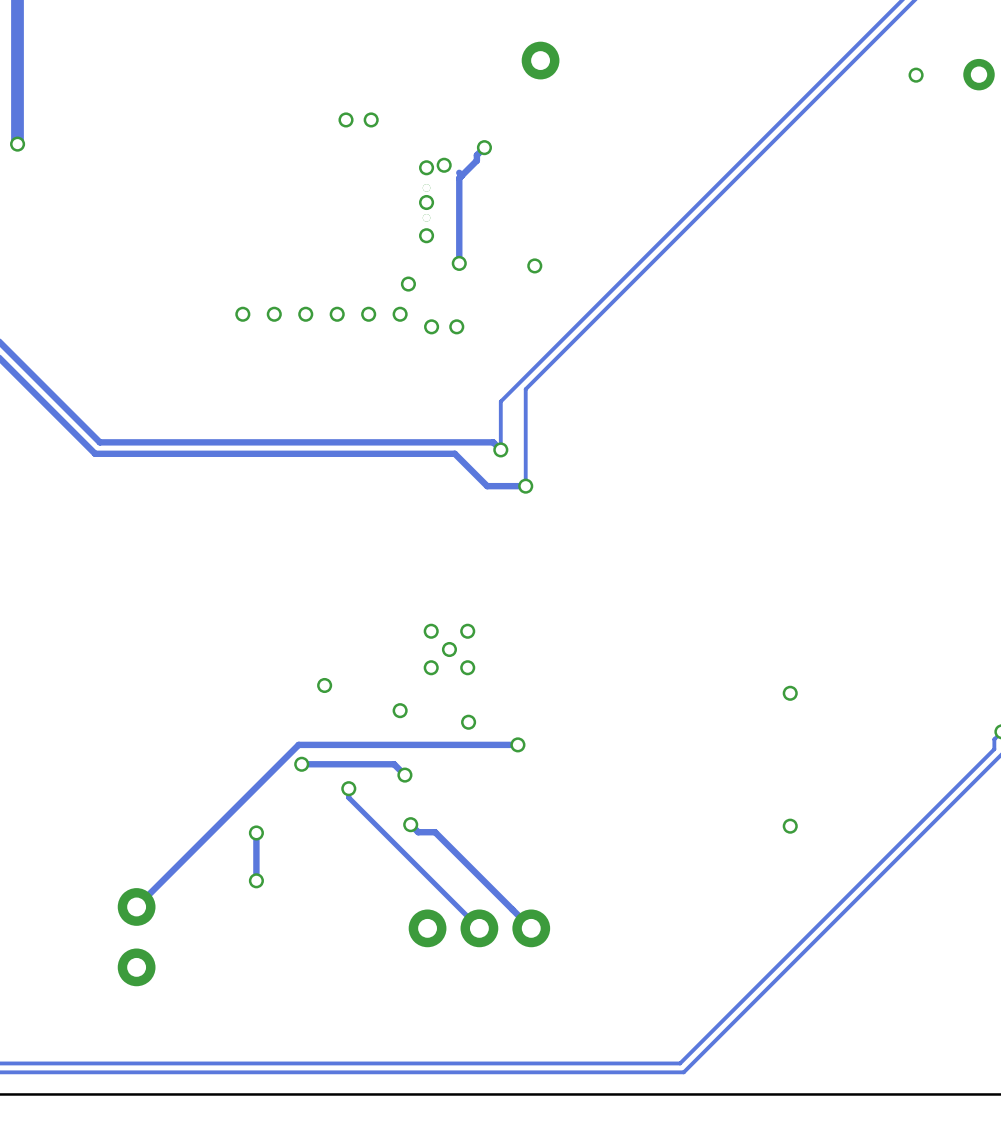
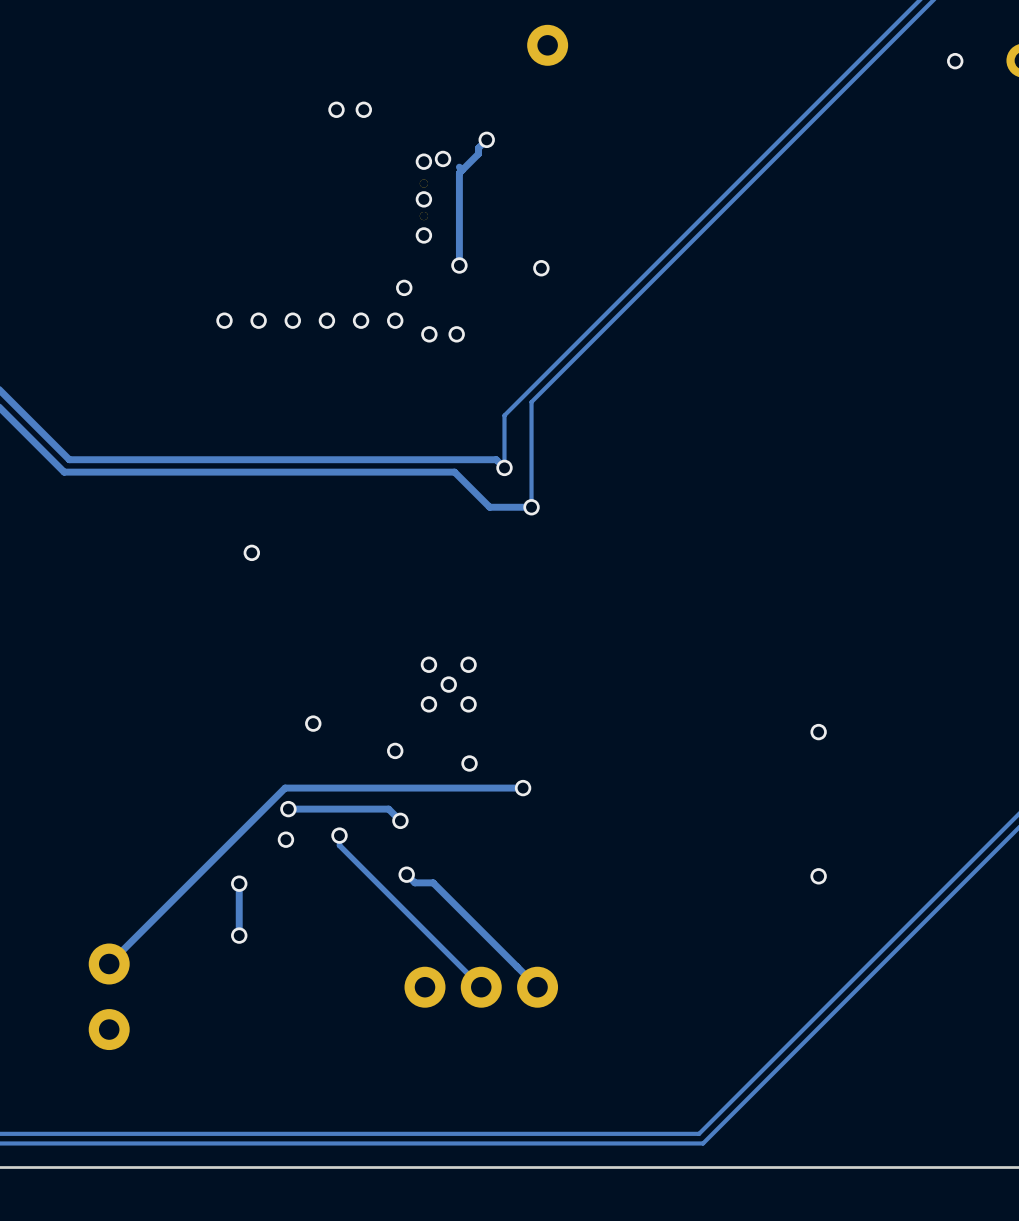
via: none -> (251, 552)
via: none -> (285, 839)

